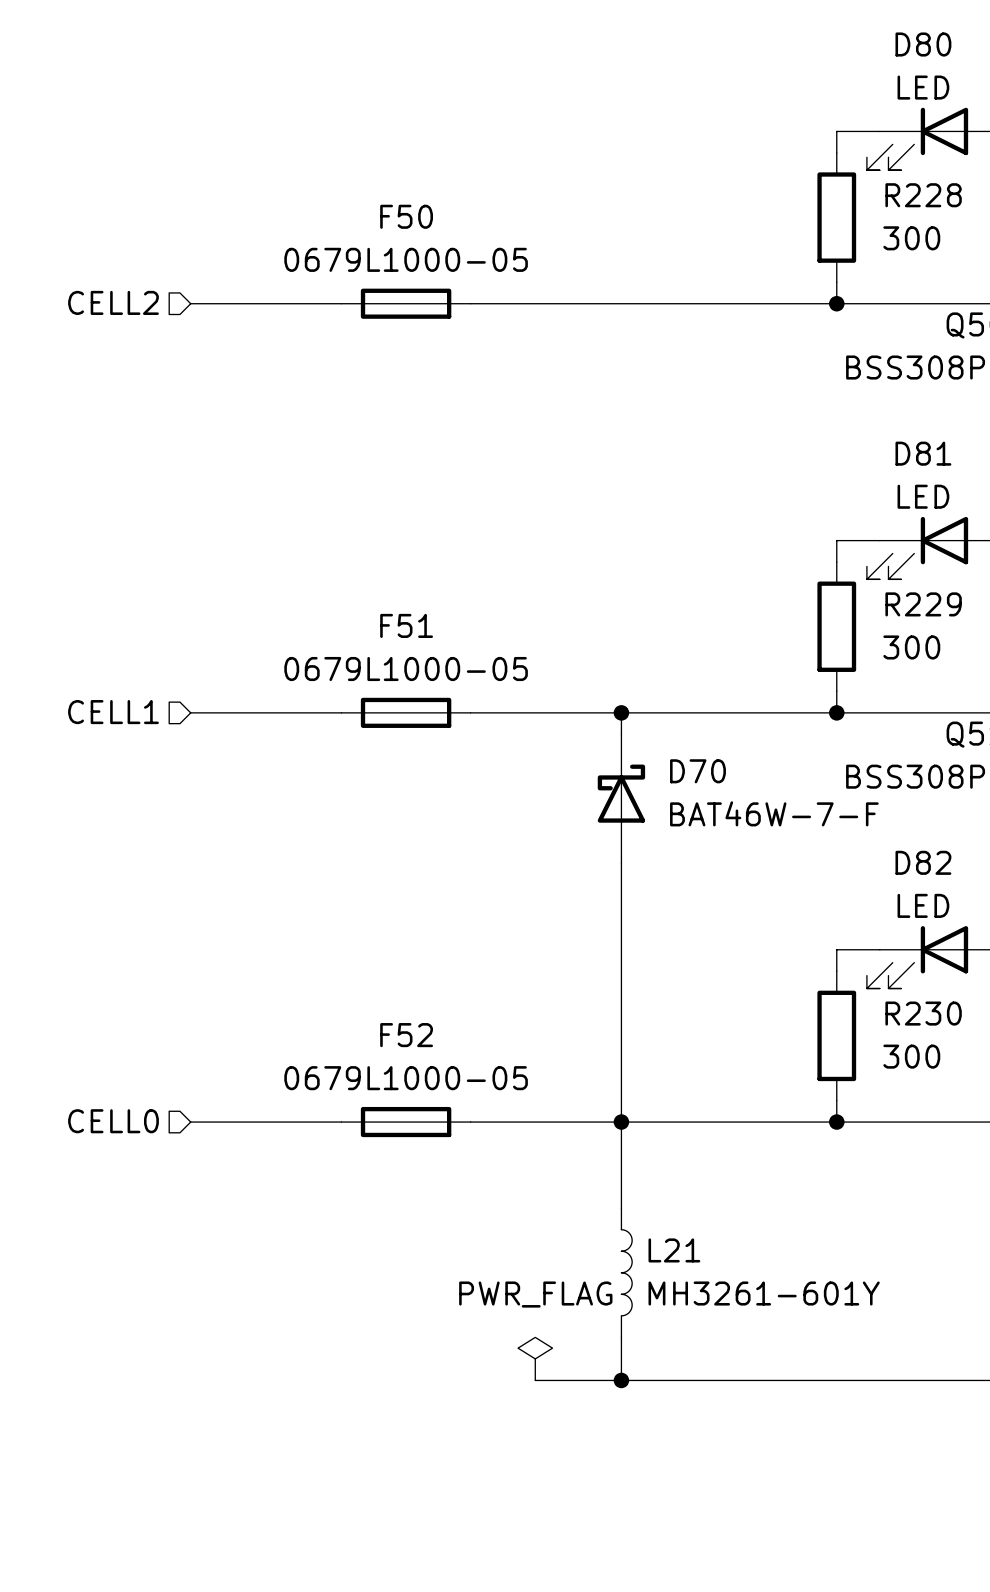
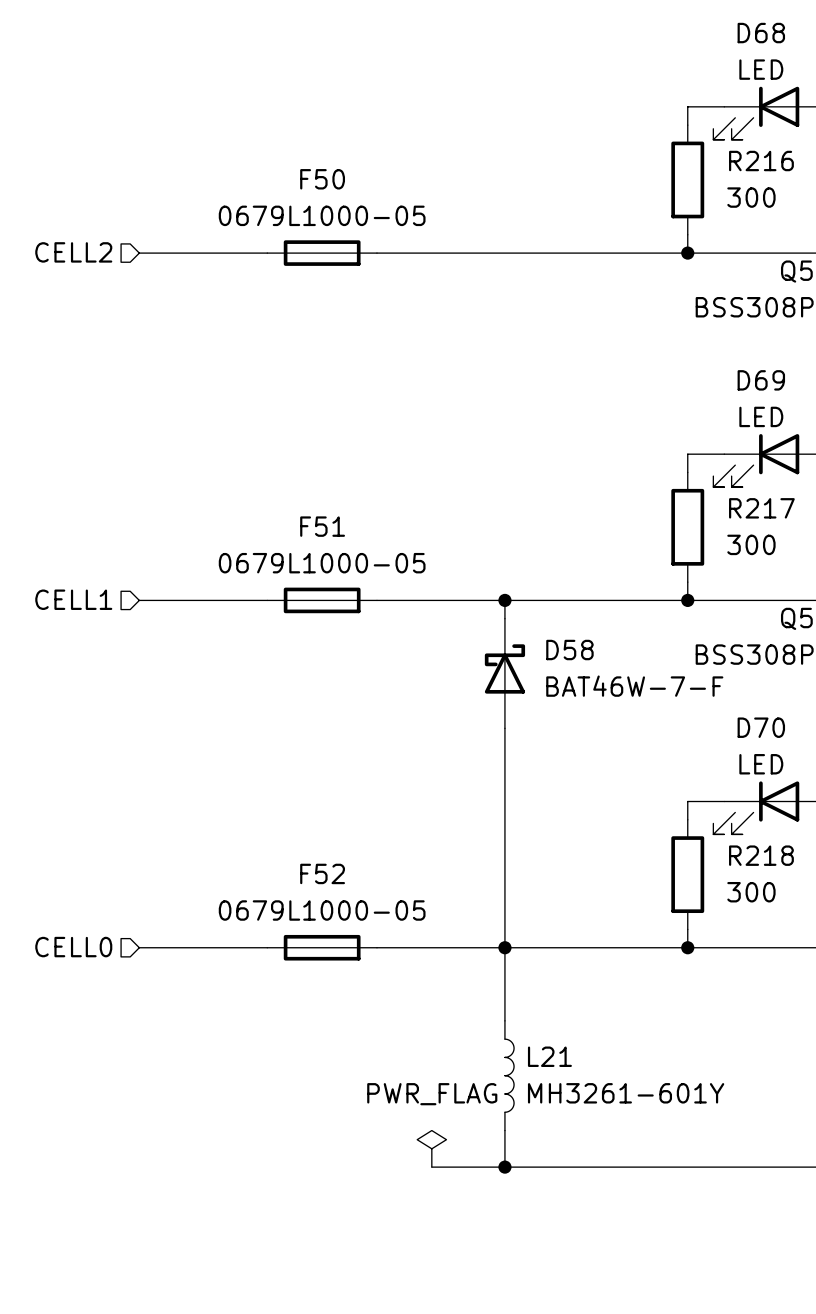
D80 name: D80 (923, 44) -> D68 (761, 33)
R228 name: R228 (923, 195) -> R216 (761, 161)
D81 name: D81 (923, 453) -> D69 (761, 380)
R229 name: R229 (923, 604) -> R217 (761, 508)
D70 name: D70 (697, 771) -> D58 (569, 650)
D82 name: D82 (923, 862) -> D70 (761, 727)
R230 name: R230 (923, 1013) -> R218 (761, 855)

